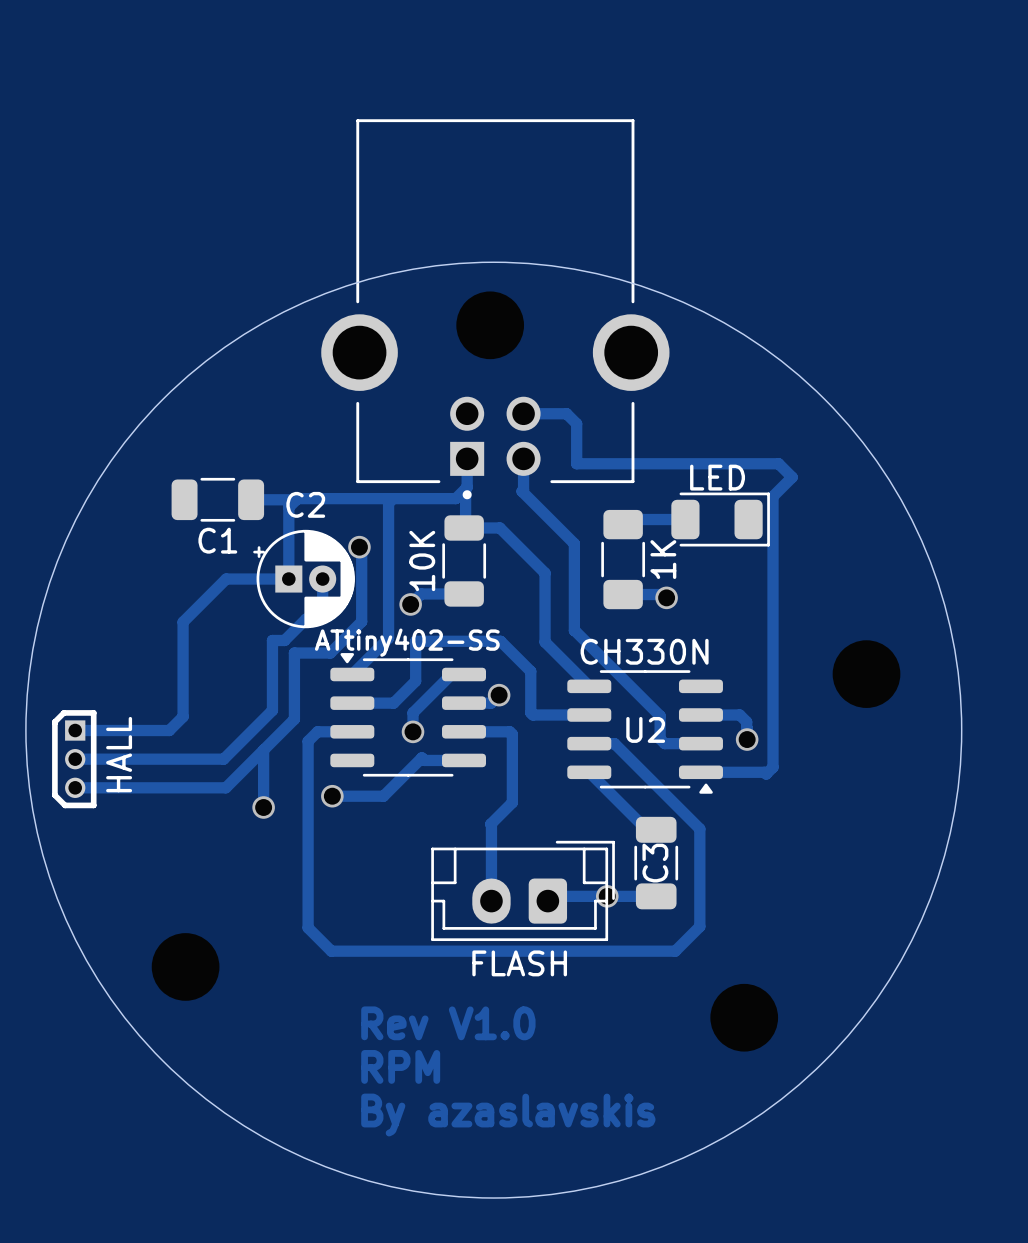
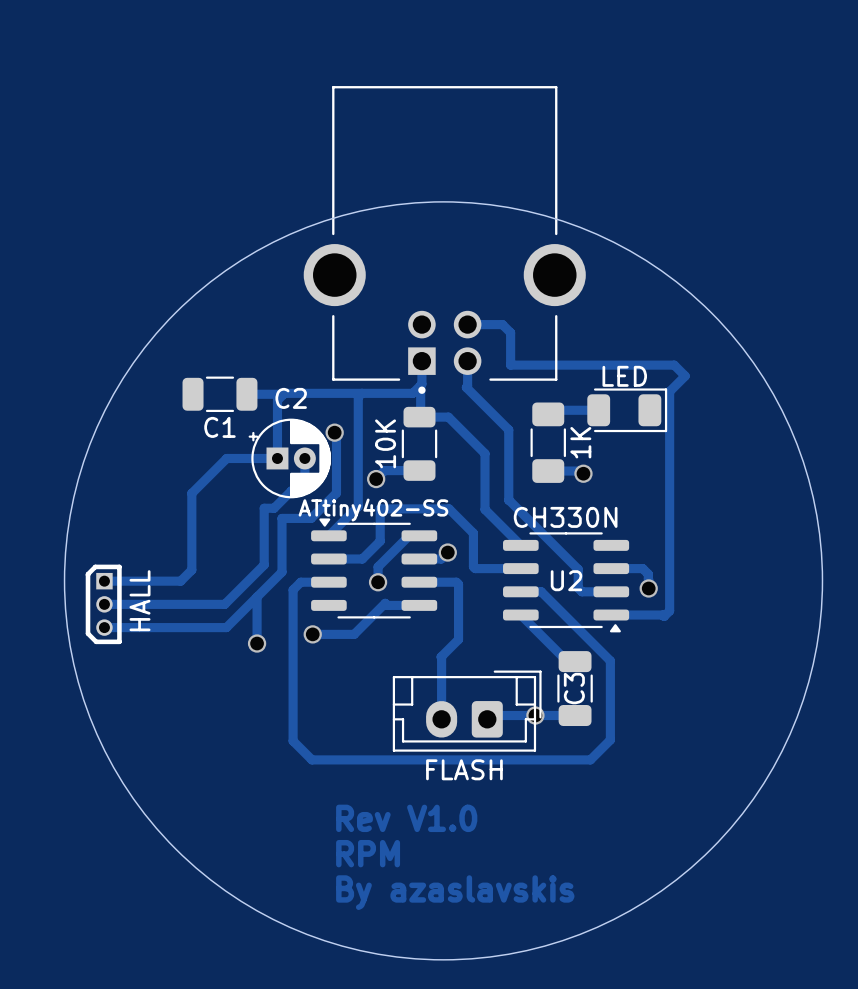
via: (490, 325) -> none
via: (866, 674) -> none
via: (185, 966) -> none
via: (744, 1017) -> none

